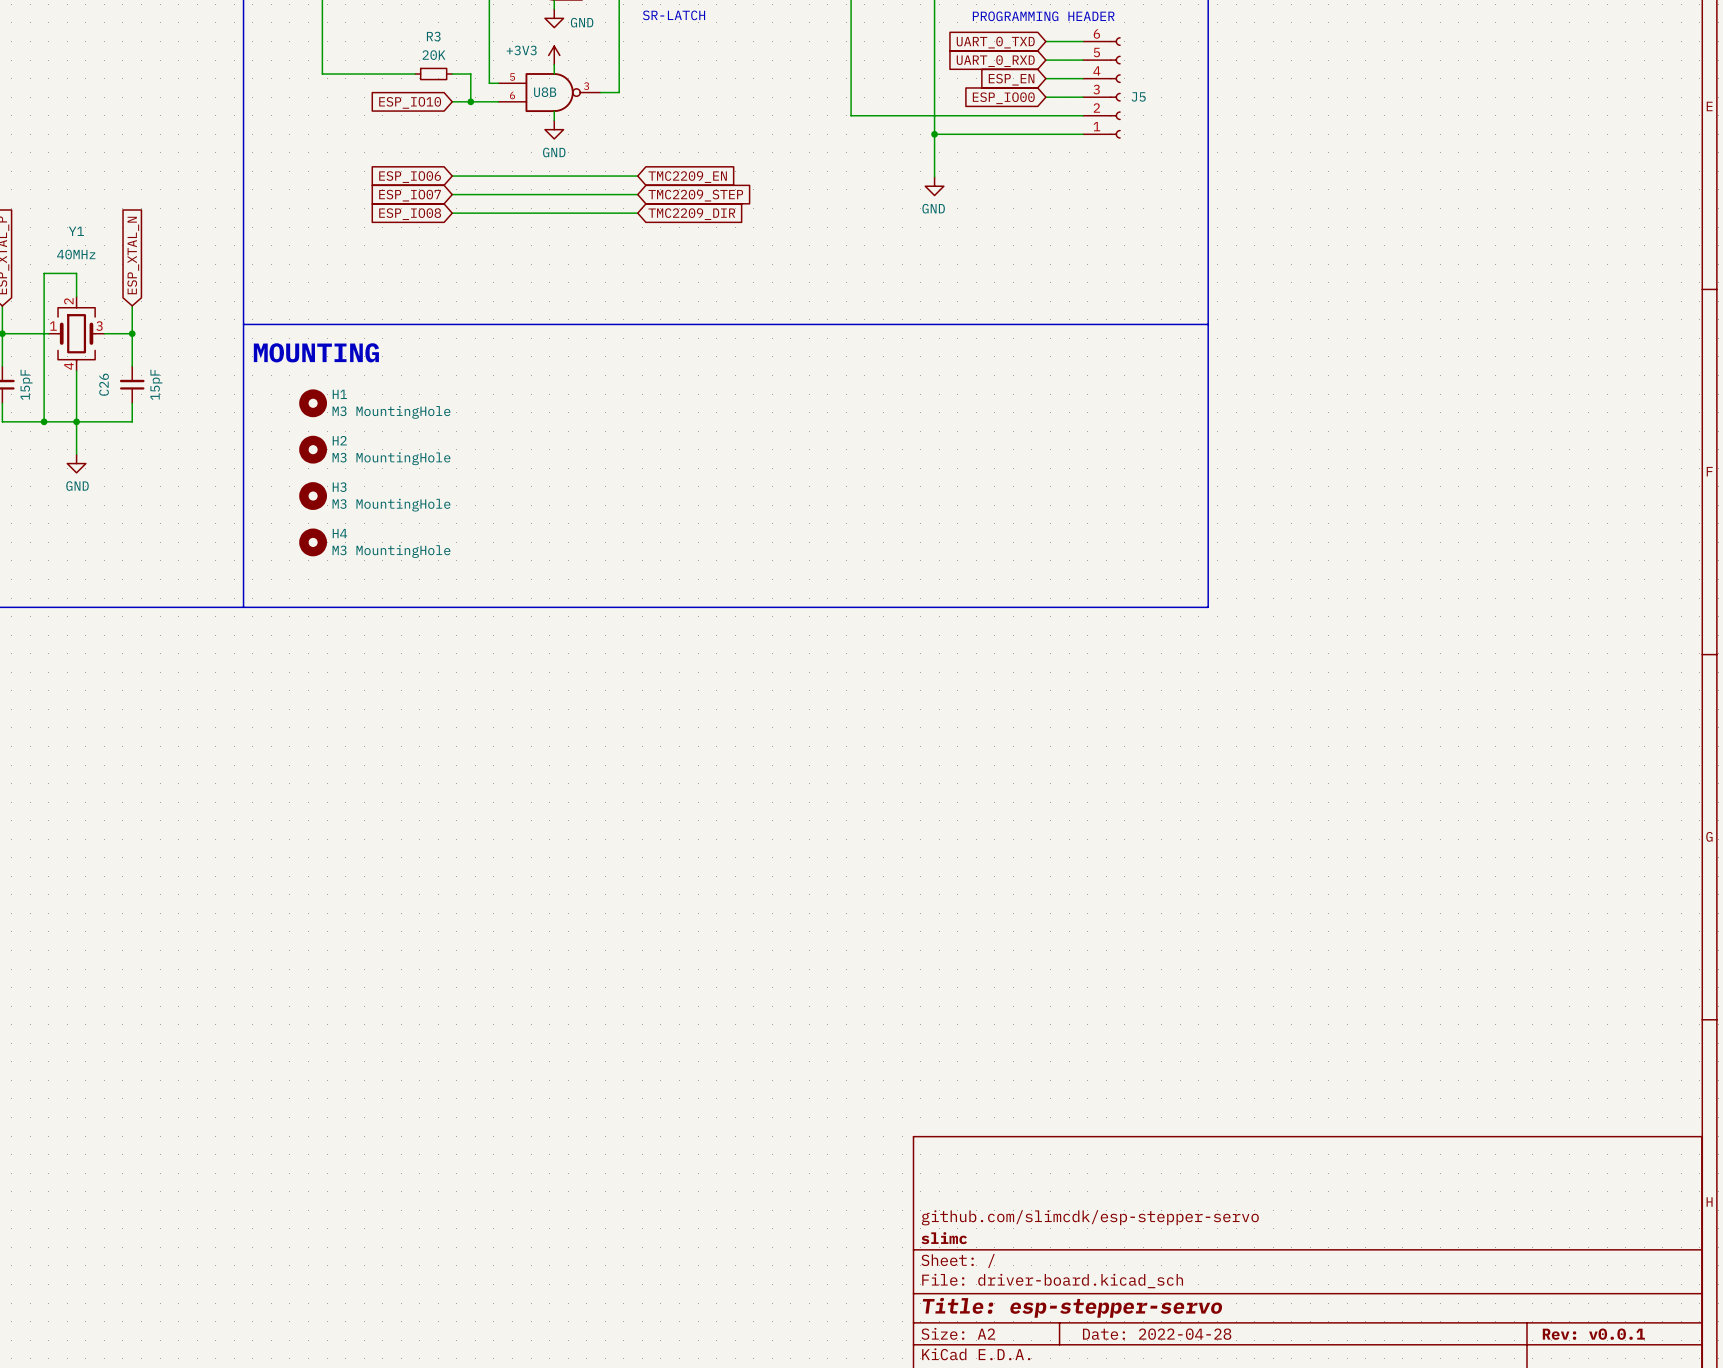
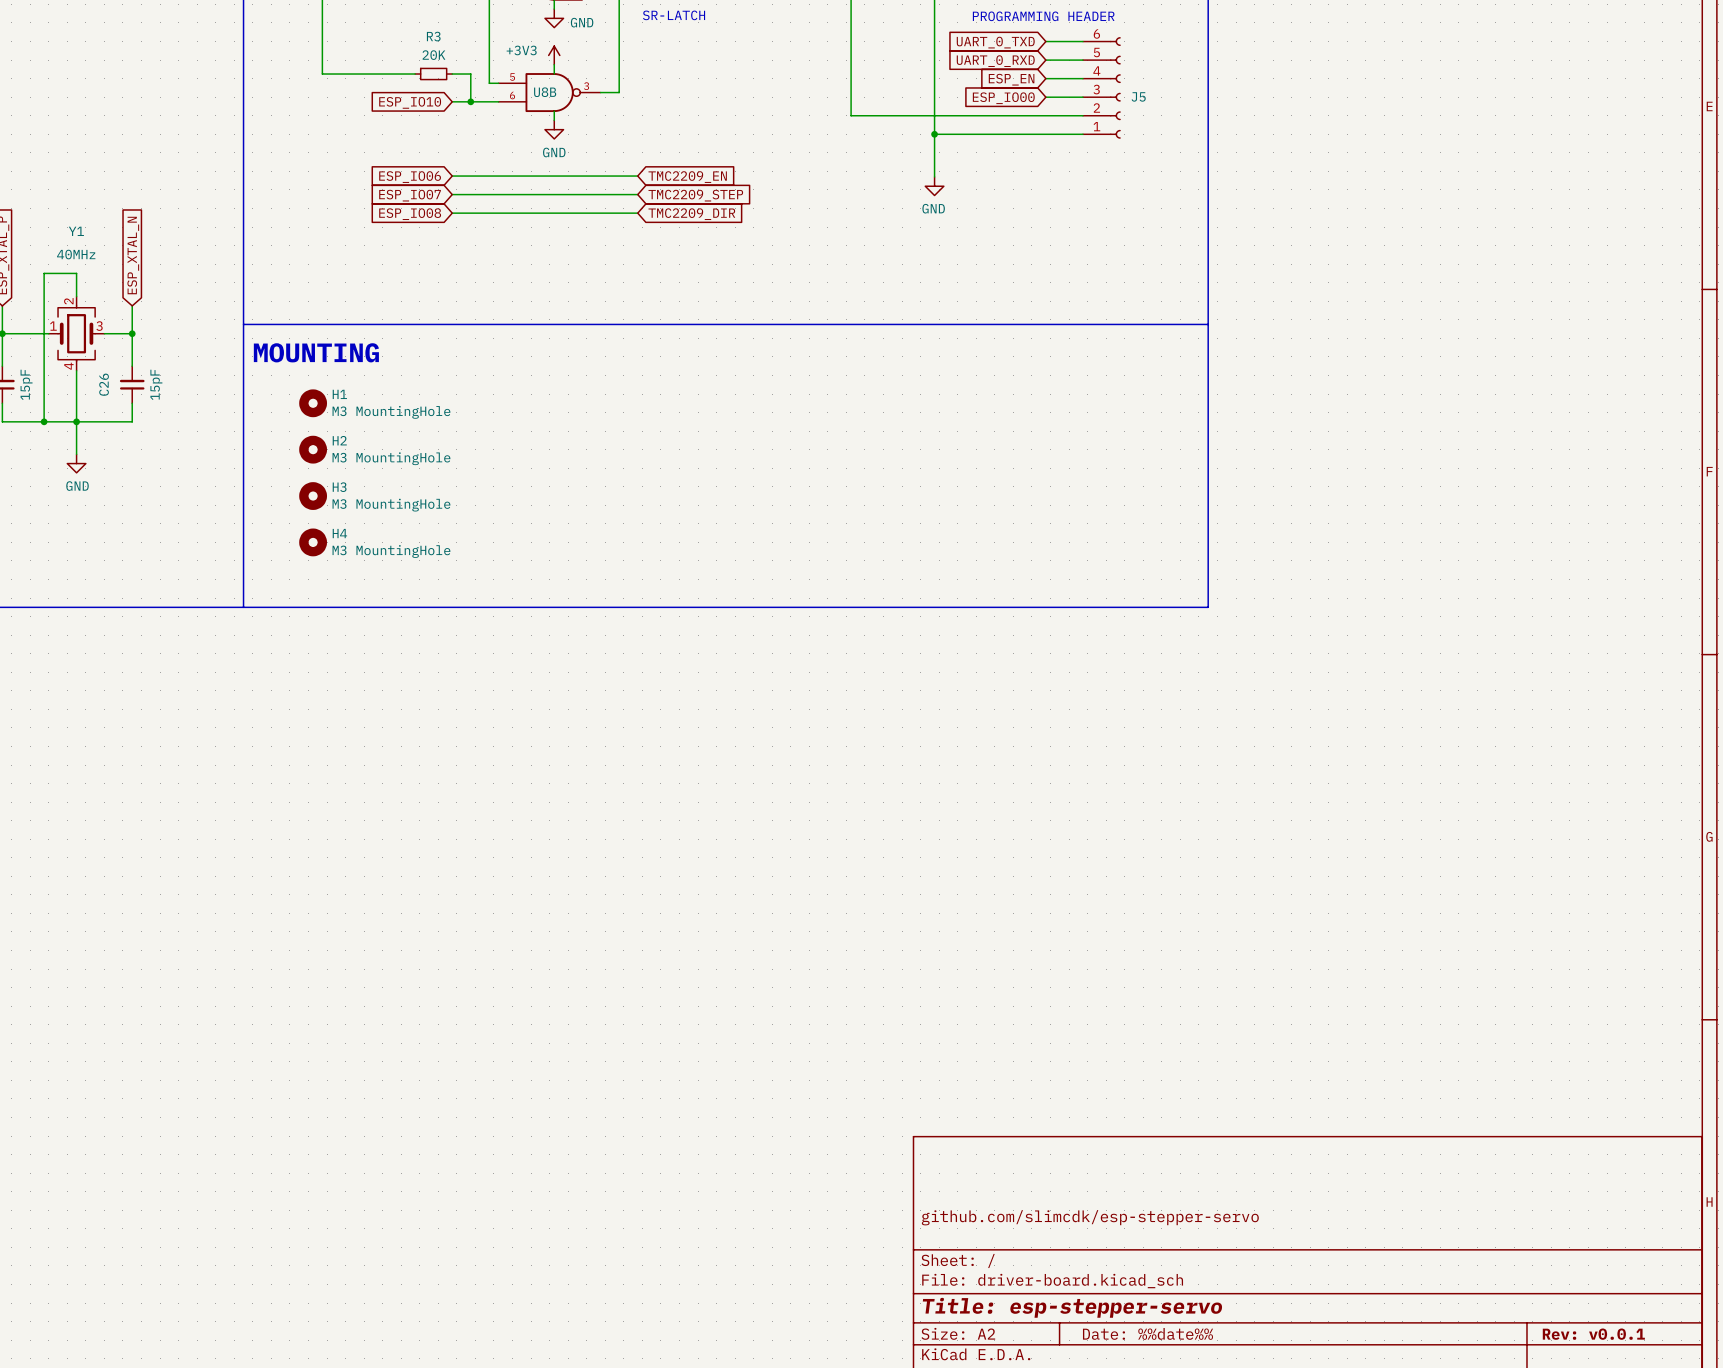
title block: slimc (944, 1238) -> none
title block: Date: 2022-04-28 (1157, 1334) -> Date: %%date%% (1148, 1333)

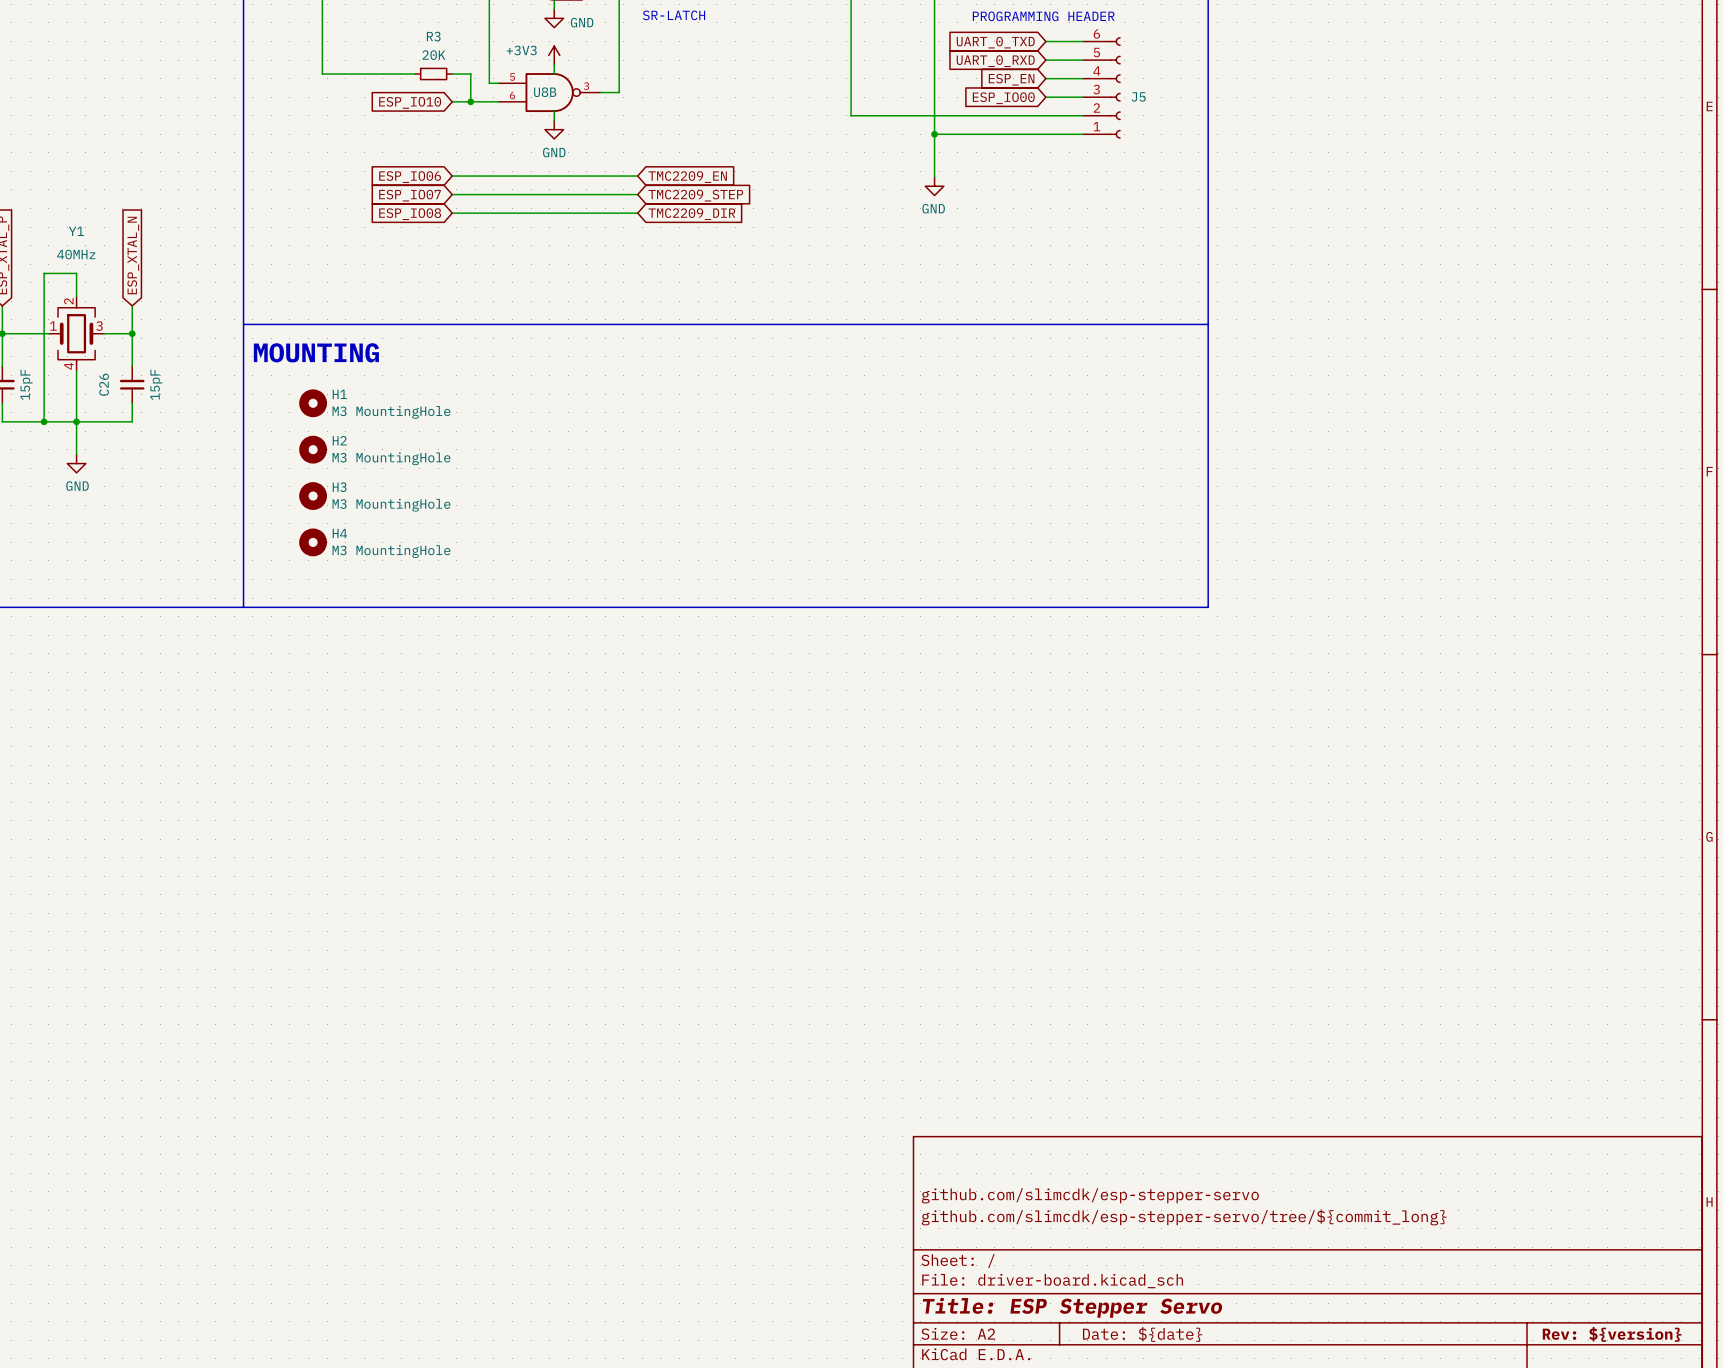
title block: none -> github.com/slimcdk/esp-stepper-servo (1090, 1195)
title block: github.com/slimcdk/esp-stepper-servo (1090, 1217) -> github.com/slimcdk/esp-stepper-servo/tree/${commit_long} (1184, 1217)
title block: Title: esp-stepper-servo (1072, 1307) -> Title: ESP Stepper Servo (1072, 1307)
title block: Date: %%date%% (1148, 1333) -> Date: ${date} (1142, 1334)
title block: Rev: v0.0.1 (1593, 1334) -> Rev: ${version} (1612, 1334)

